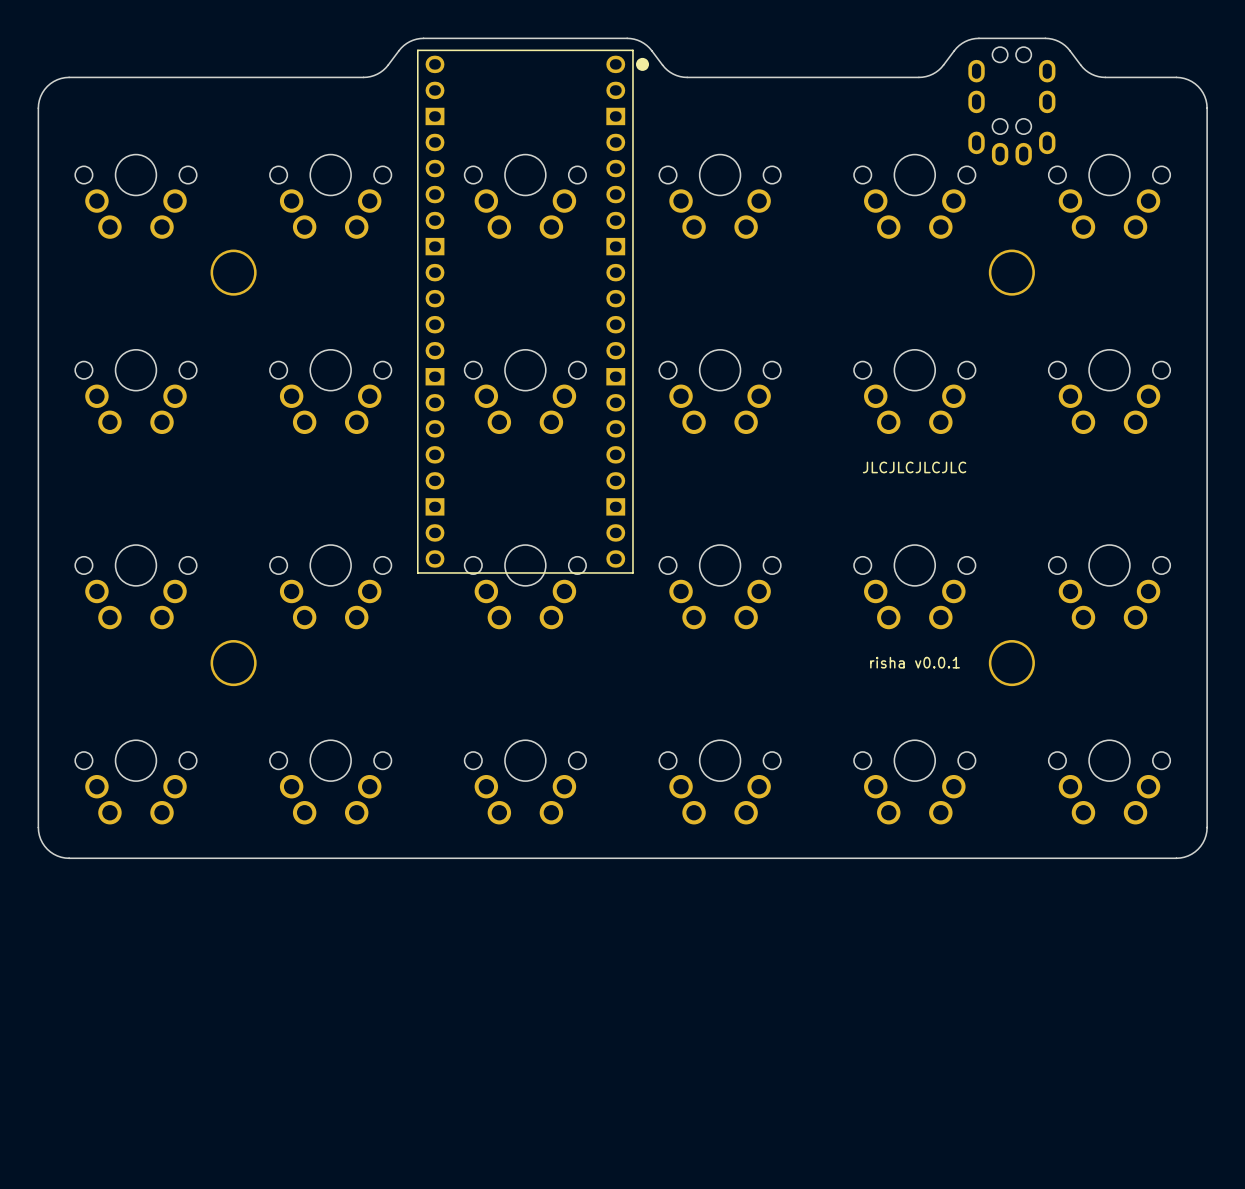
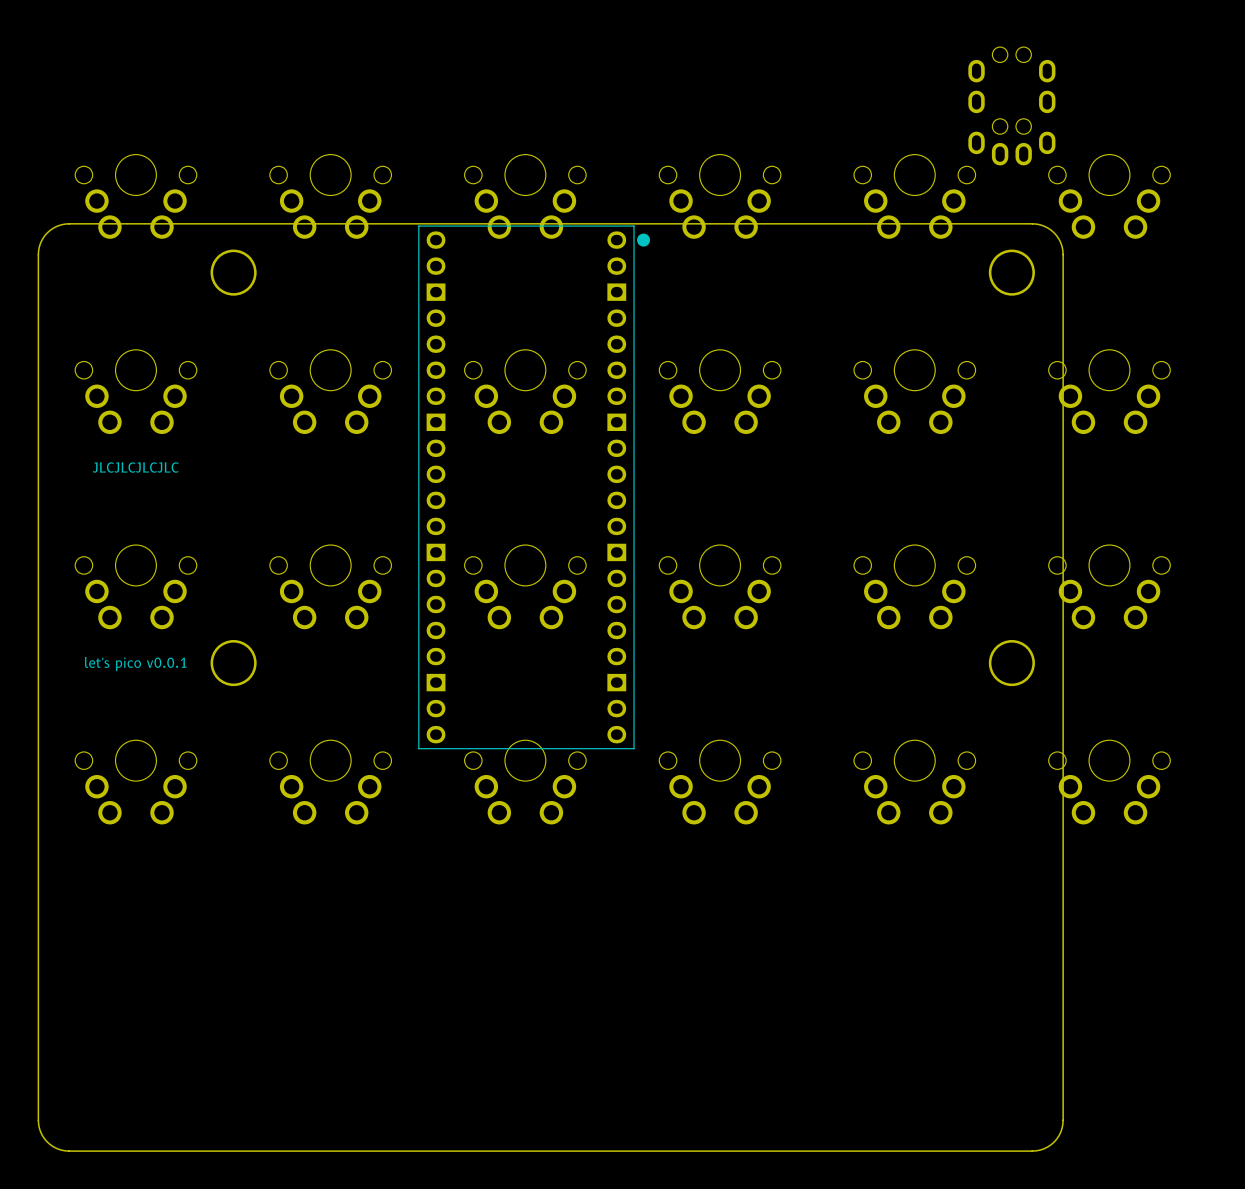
board edge: (978, 38) (1052, 39) (1065, 45) (1083, 67) (1094, 75) (1105, 77) (1184, 78) (1198, 86) (1206, 100) (1207, 827) (1204, 839) (1195, 851) (1188, 855) (1176, 858) (69, 858) (57, 855) (47, 849) (40, 839) (38, 827) -> (38, 254) (40, 242) (47, 232) (57, 226) (69, 223) (1032, 223) (1040, 224) (1051, 230) (1060, 242) (1063, 254) (1062, 1128) (1056, 1139) (1051, 1144) (1044, 1148) (1032, 1151) (61, 1150) (50, 1144) (44, 1139) (38, 1124) (38, 827)
board edge: (978, 38) (968, 40) (959, 45) (943, 65) -> none
board edge: (651, 50) (640, 41) (627, 38) (423, 38) (406, 43) (383, 70) (367, 77) (61, 78) (53, 81) (44, 89) (38, 104) (38, 254) -> none
board edge: (651, 50) (667, 70) (676, 75) (687, 77) -> none
board edge: (943, 65) (932, 74) (918, 77) (687, 77) -> none
part position: (533, 311) -> (534, 487)
text: none -> JLCJLCJLCJLC (135, 467)
text: JLCJLCJLCJLC (914, 467) -> none
text: risha v0.0.1 (915, 662) -> none
text: none -> let's pico v0.0.1 (135, 664)

